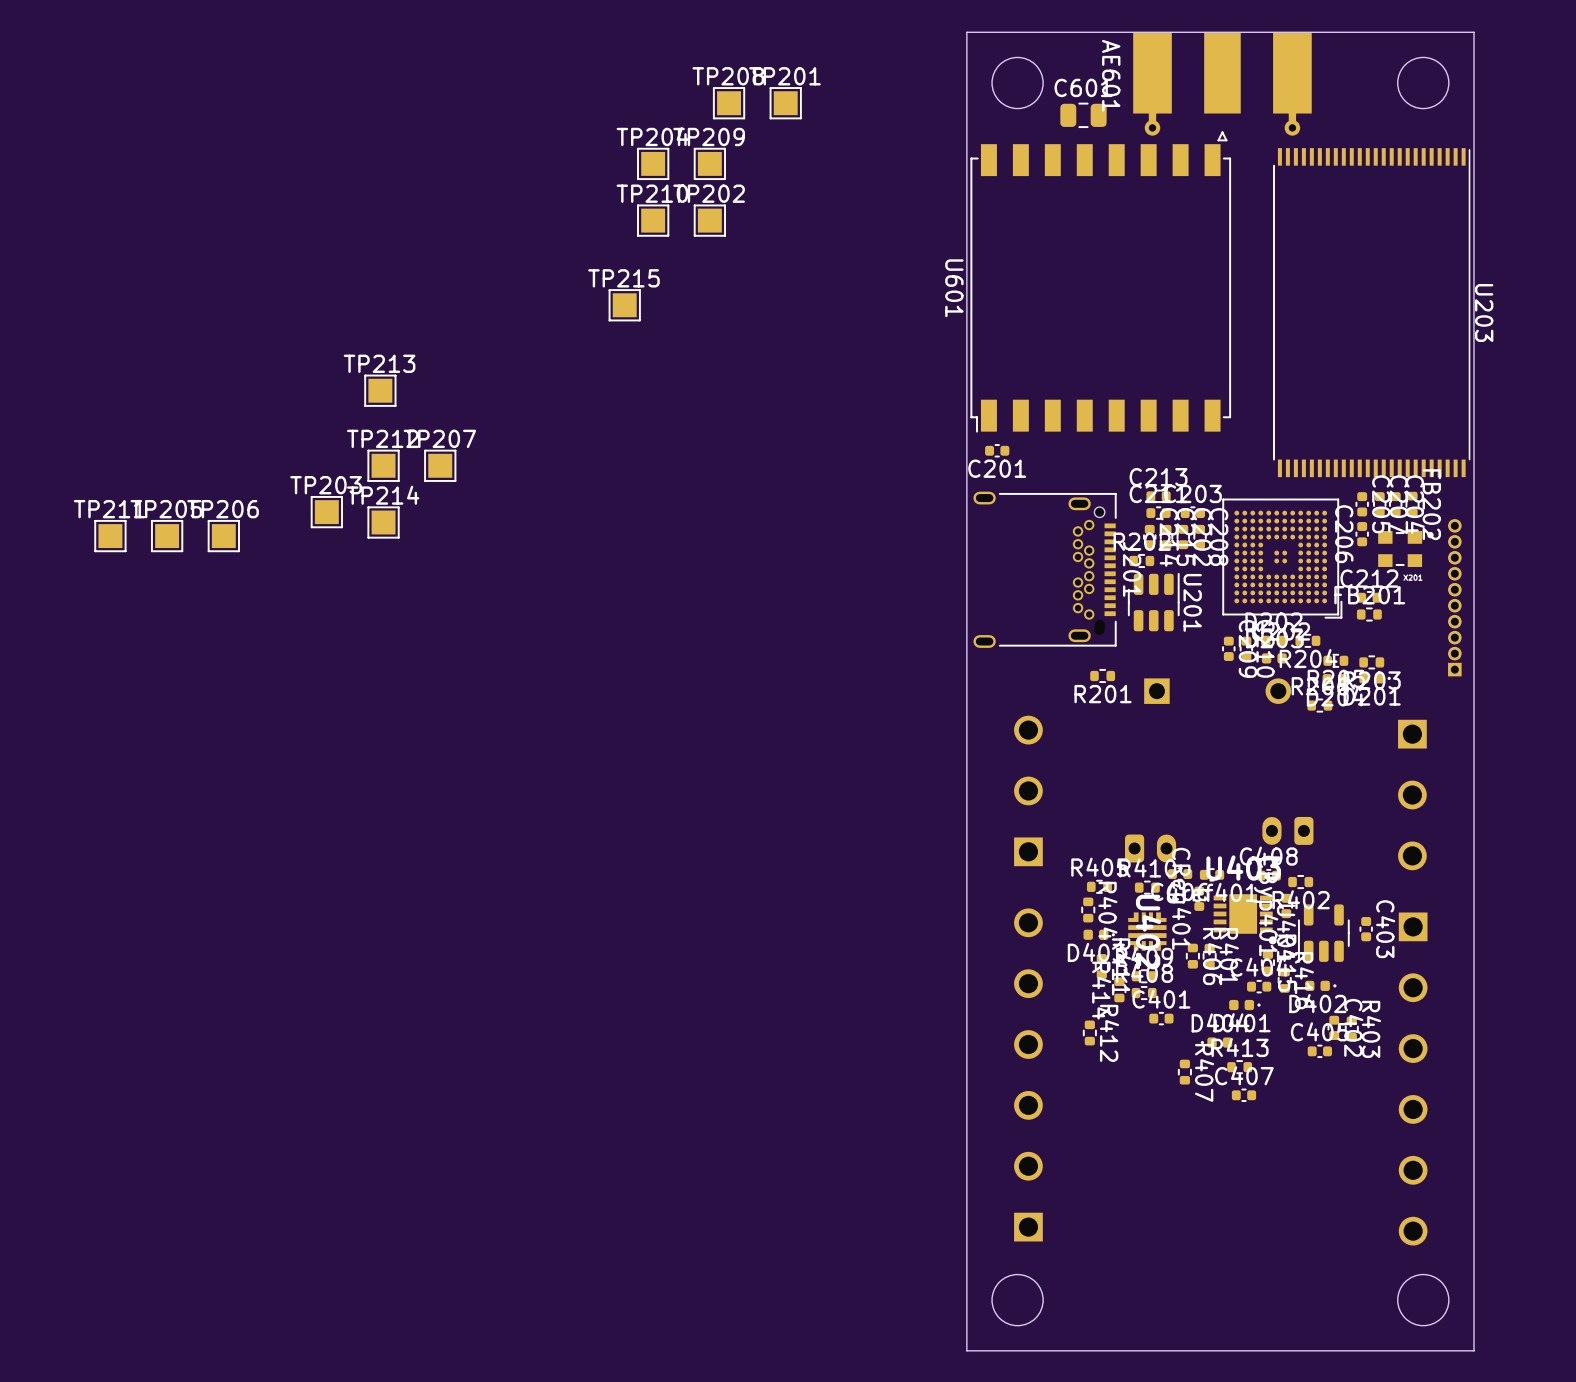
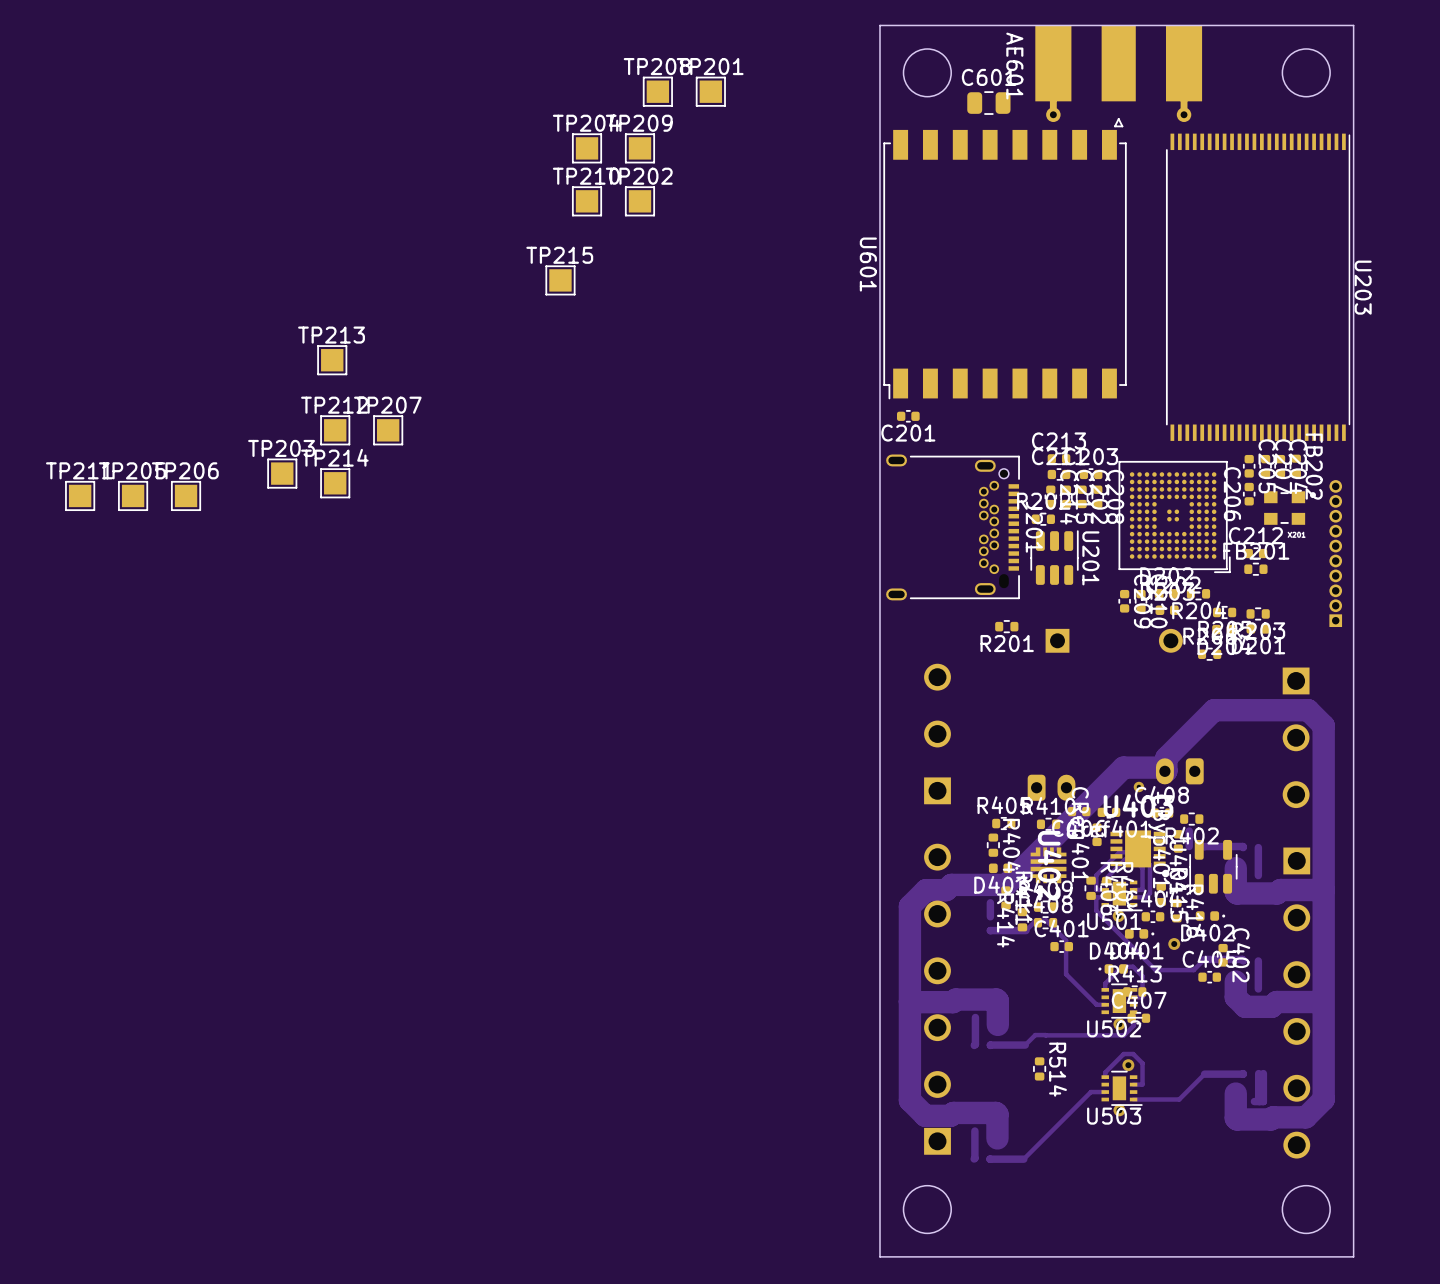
via: none -> (1138, 786)
track: none -> (1189, 831) (1189, 846)
track: none -> (1243, 847) (1204, 846) (1204, 848)
track: none -> (1258, 847) (1258, 875)
C403: (1366, 929) -> none
track: none -> (1235, 868) (1237, 893) (1277, 893) (1280, 890) (1323, 890)
track: none -> (1105, 882) (1105, 879) (1124, 859) (1134, 859) (1142, 868) (1142, 889) (1133, 889)
track: none -> (1105, 889) (1096, 889) (1096, 875) (1119, 852) (1137, 852) (1150, 865) (1150, 893) (1145, 897) (1133, 897)
U501: none -> (1122, 893)
track: none -> (1105, 897) (1096, 897) (1096, 910) (1155, 970) (1193, 970) (1204, 959) (1243, 960)
track: none -> (990, 902) (990, 916)
via: none -> (1118, 916)
track: none -> (990, 930) (1026, 930) (1036, 920) (1046, 920) (1066, 940) (1066, 974) (1096, 1004) (1105, 1004)
via: none -> (1174, 944)
R403: (1351, 1028) -> none
R412: (1089, 1032) -> none
track: none -> (1258, 960) (1258, 988)
track: none -> (1235, 981) (1235, 997) (1245, 1006) (1271, 1006) (1276, 1002) (1321, 1002)
track: none -> (1105, 989) (1105, 983) (1122, 966) (1133, 966) (1142, 976) (1142, 996) (1133, 997)
R407: (1184, 1072) -> none
U502: none -> (1122, 1001)
track: none -> (909, 1001) (953, 1002) (955, 999) (996, 999) (997, 1024)
track: none -> (1133, 1012) (1133, 1025) (1124, 1035) (1035, 1035) (1025, 1045) (990, 1045)
track: none -> (975, 1017) (974, 1045)
via: none -> (1119, 1024)
via: none -> (1128, 1065)
R514: none -> (1039, 1068)
track: none -> (1243, 1073) (1204, 1074) (1179, 1099) (1133, 1099)
track: none -> (1258, 1073) (1259, 1101)
track: none -> (1263, 1073) (1263, 1101) (1254, 1101)
track: none -> (1105, 1077) (1105, 1072) (1123, 1054) (1133, 1054) (1142, 1063) (1142, 1084) (1133, 1084)
U503: none -> (1122, 1088)
track: none -> (1105, 1092) (1090, 1092) (1023, 1159) (990, 1159)
track: none -> (1235, 1093) (1237, 1119) (1305, 1117) (1323, 1099) (1323, 725) (1308, 710) (1214, 710) (1166, 757) (1166, 770) (1163, 767) (1123, 767) (1006, 884) (951, 884) (946, 890) (926, 890) (909, 906) (909, 1100) (925, 1115) (950, 1115) (953, 1112) (995, 1112) (997, 1138)
via: none -> (1119, 1110)
track: none -> (974, 1131) (974, 1158)

